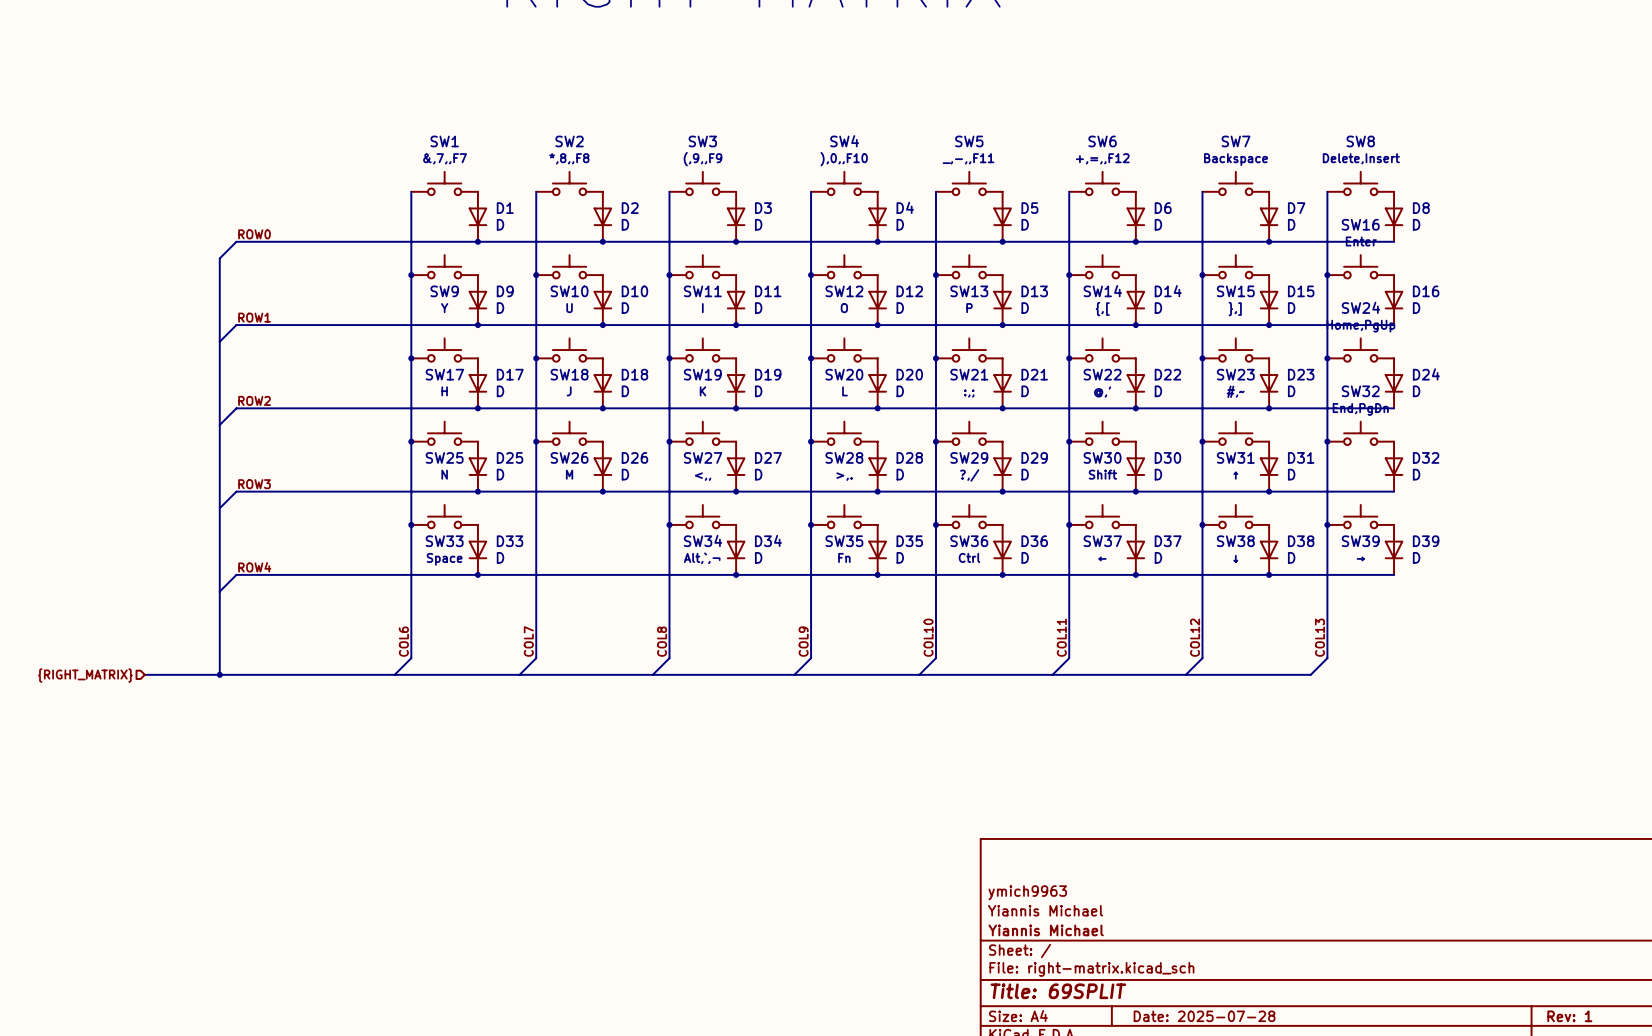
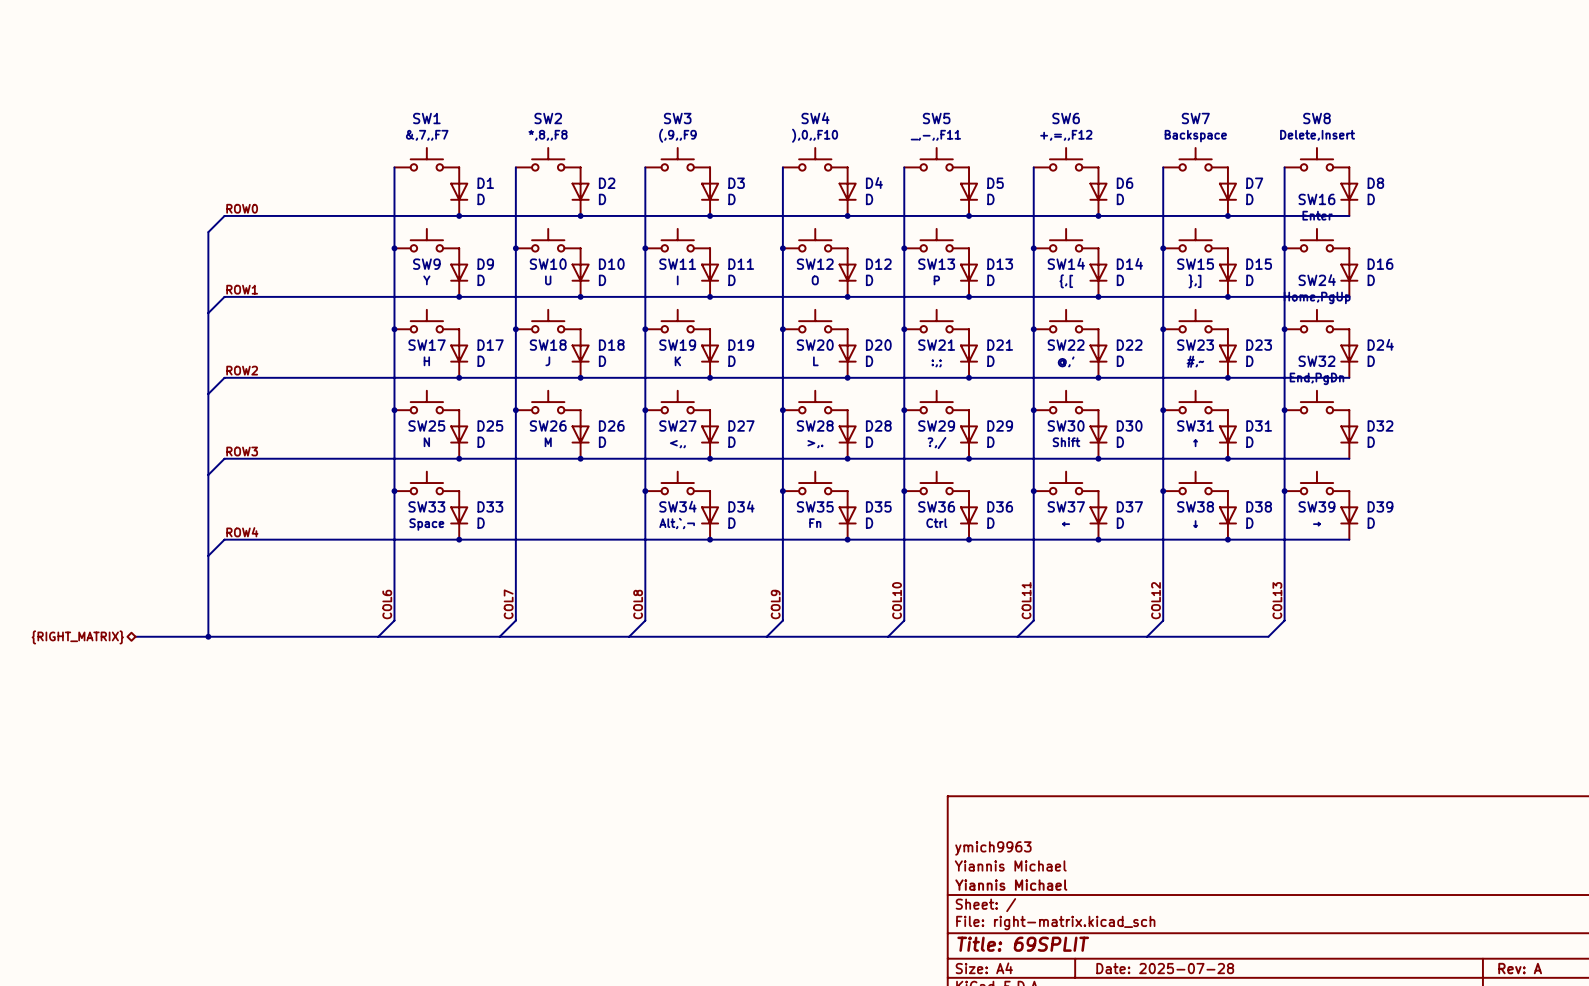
hierarchical label shape: input (85, 675) -> bidirectional (77, 637)
title block: Rev: 1 (1569, 1016) -> Rev: A (1520, 968)

